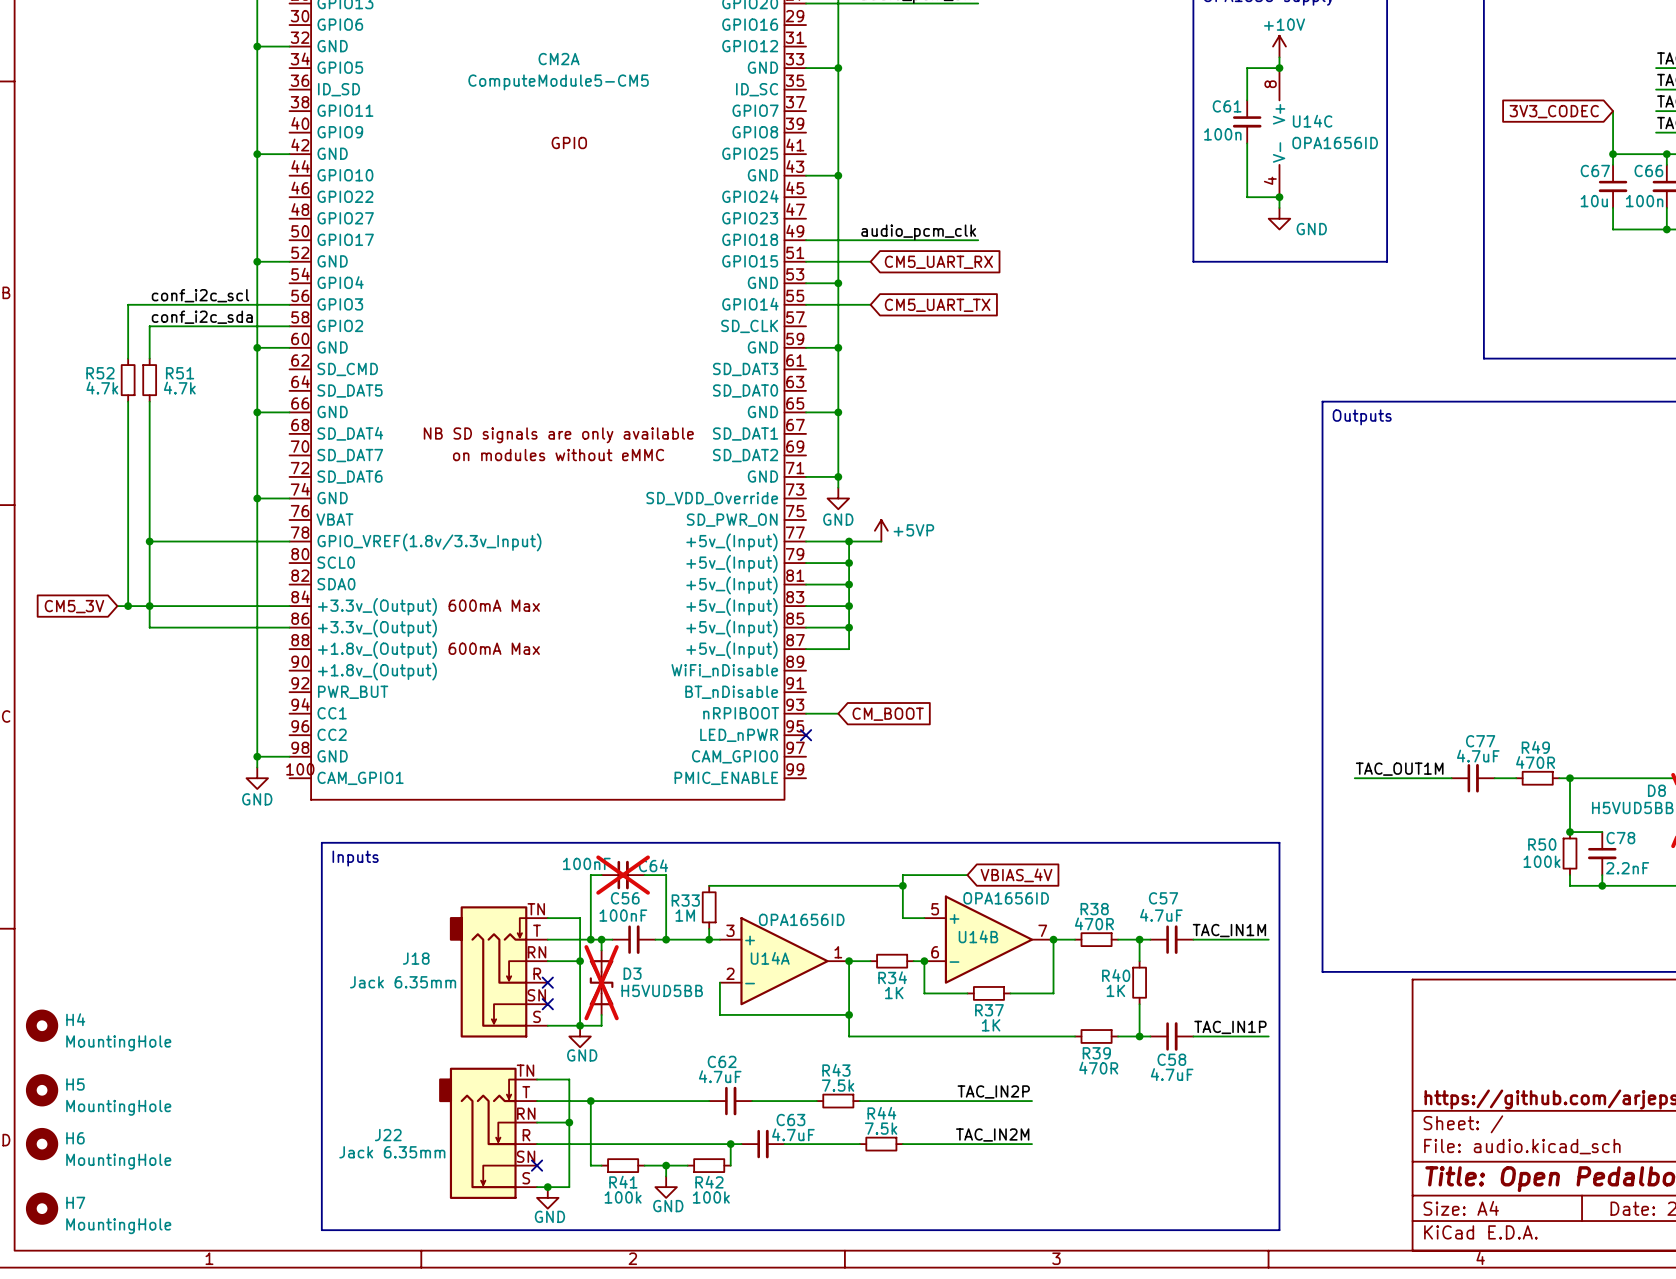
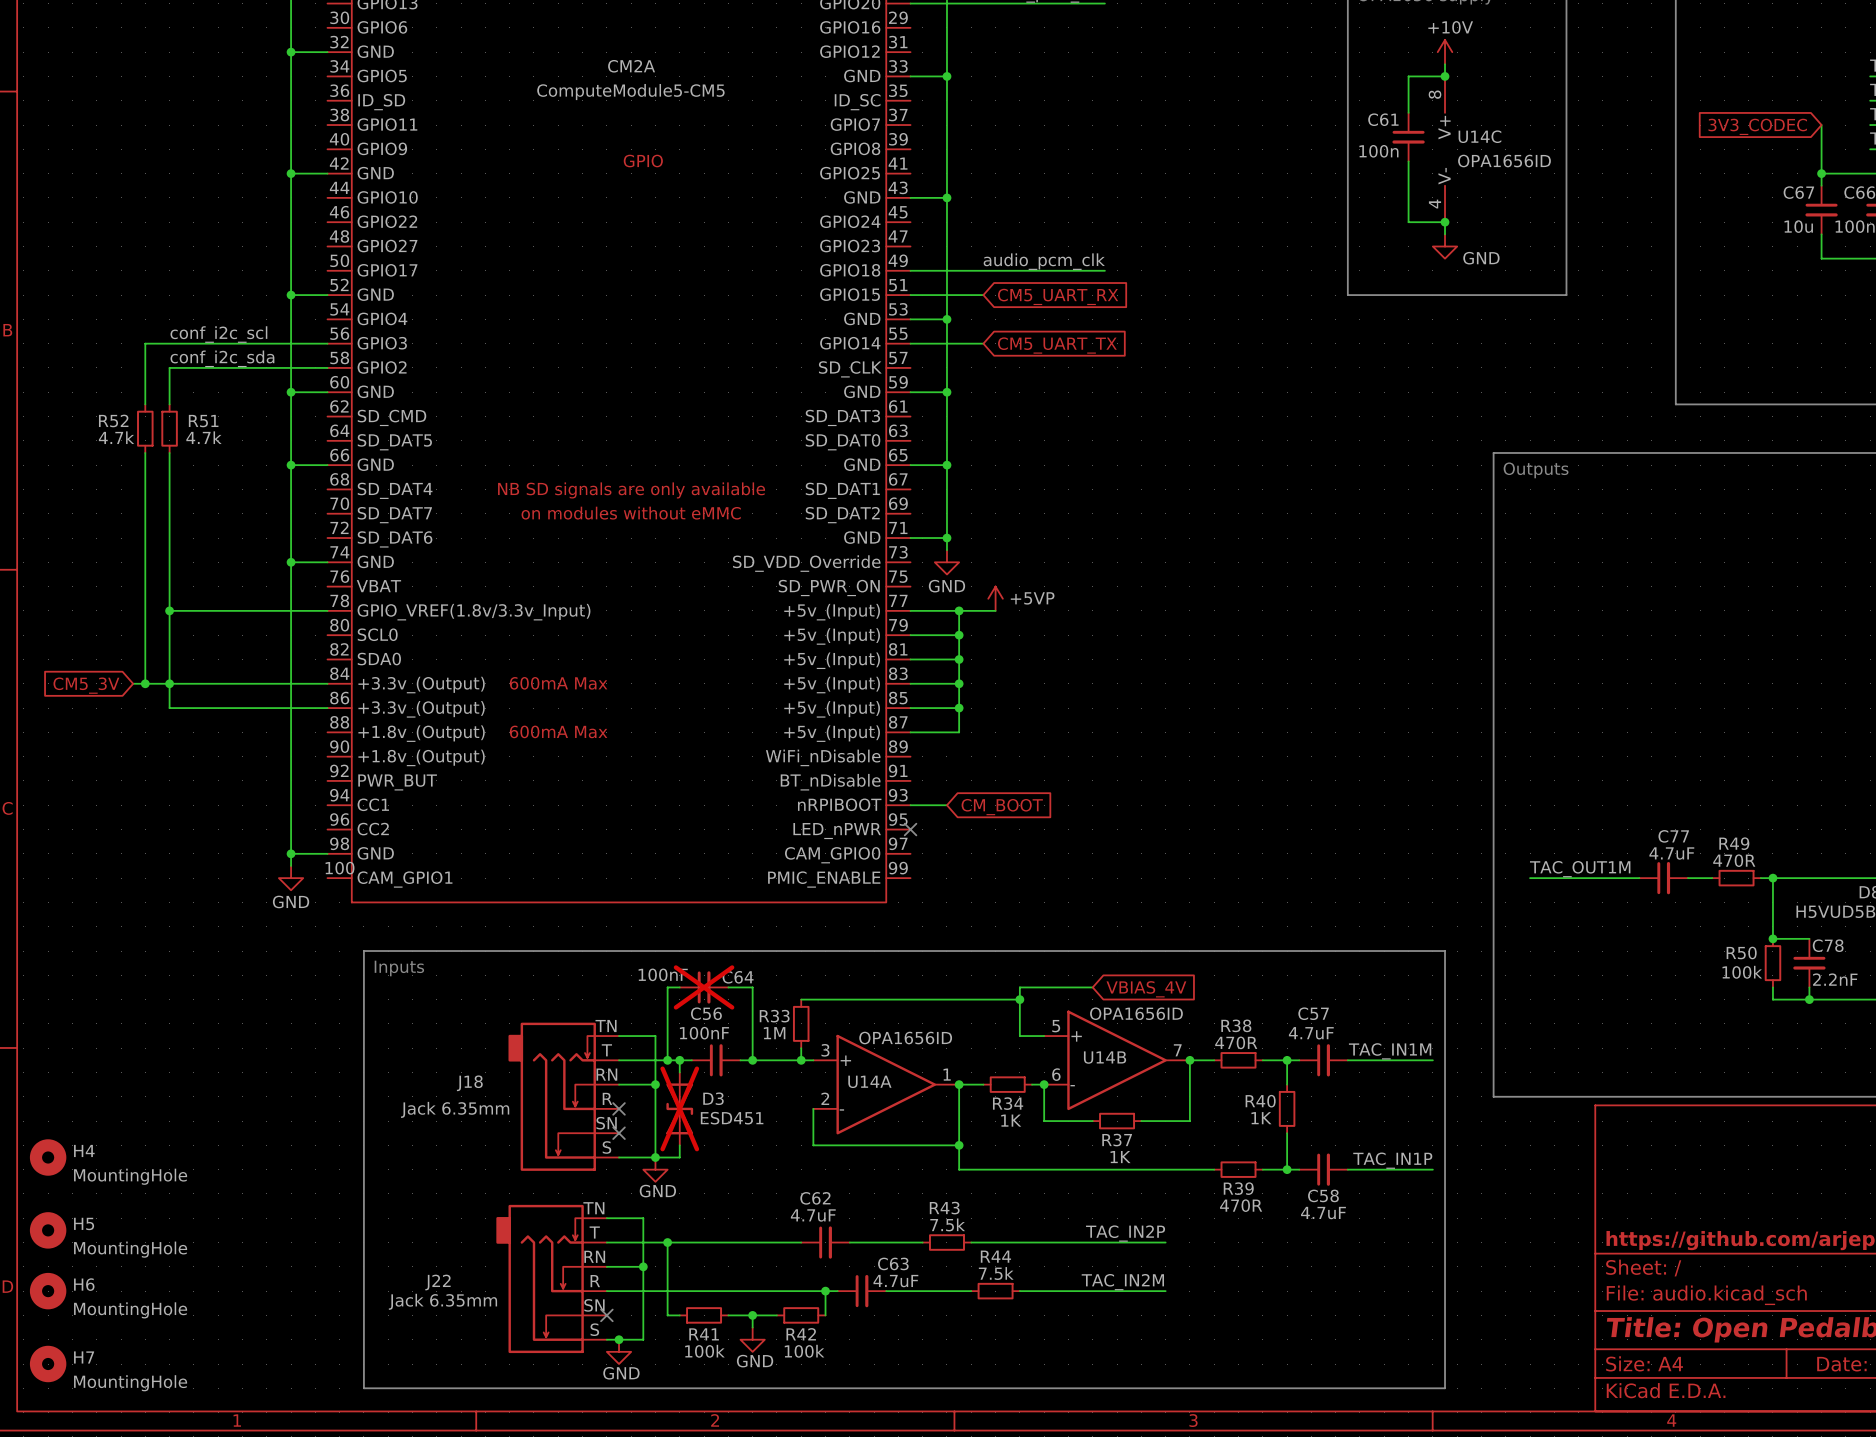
D3 value: H5VUD5BB (662, 990) -> ESD451 (732, 1118)

